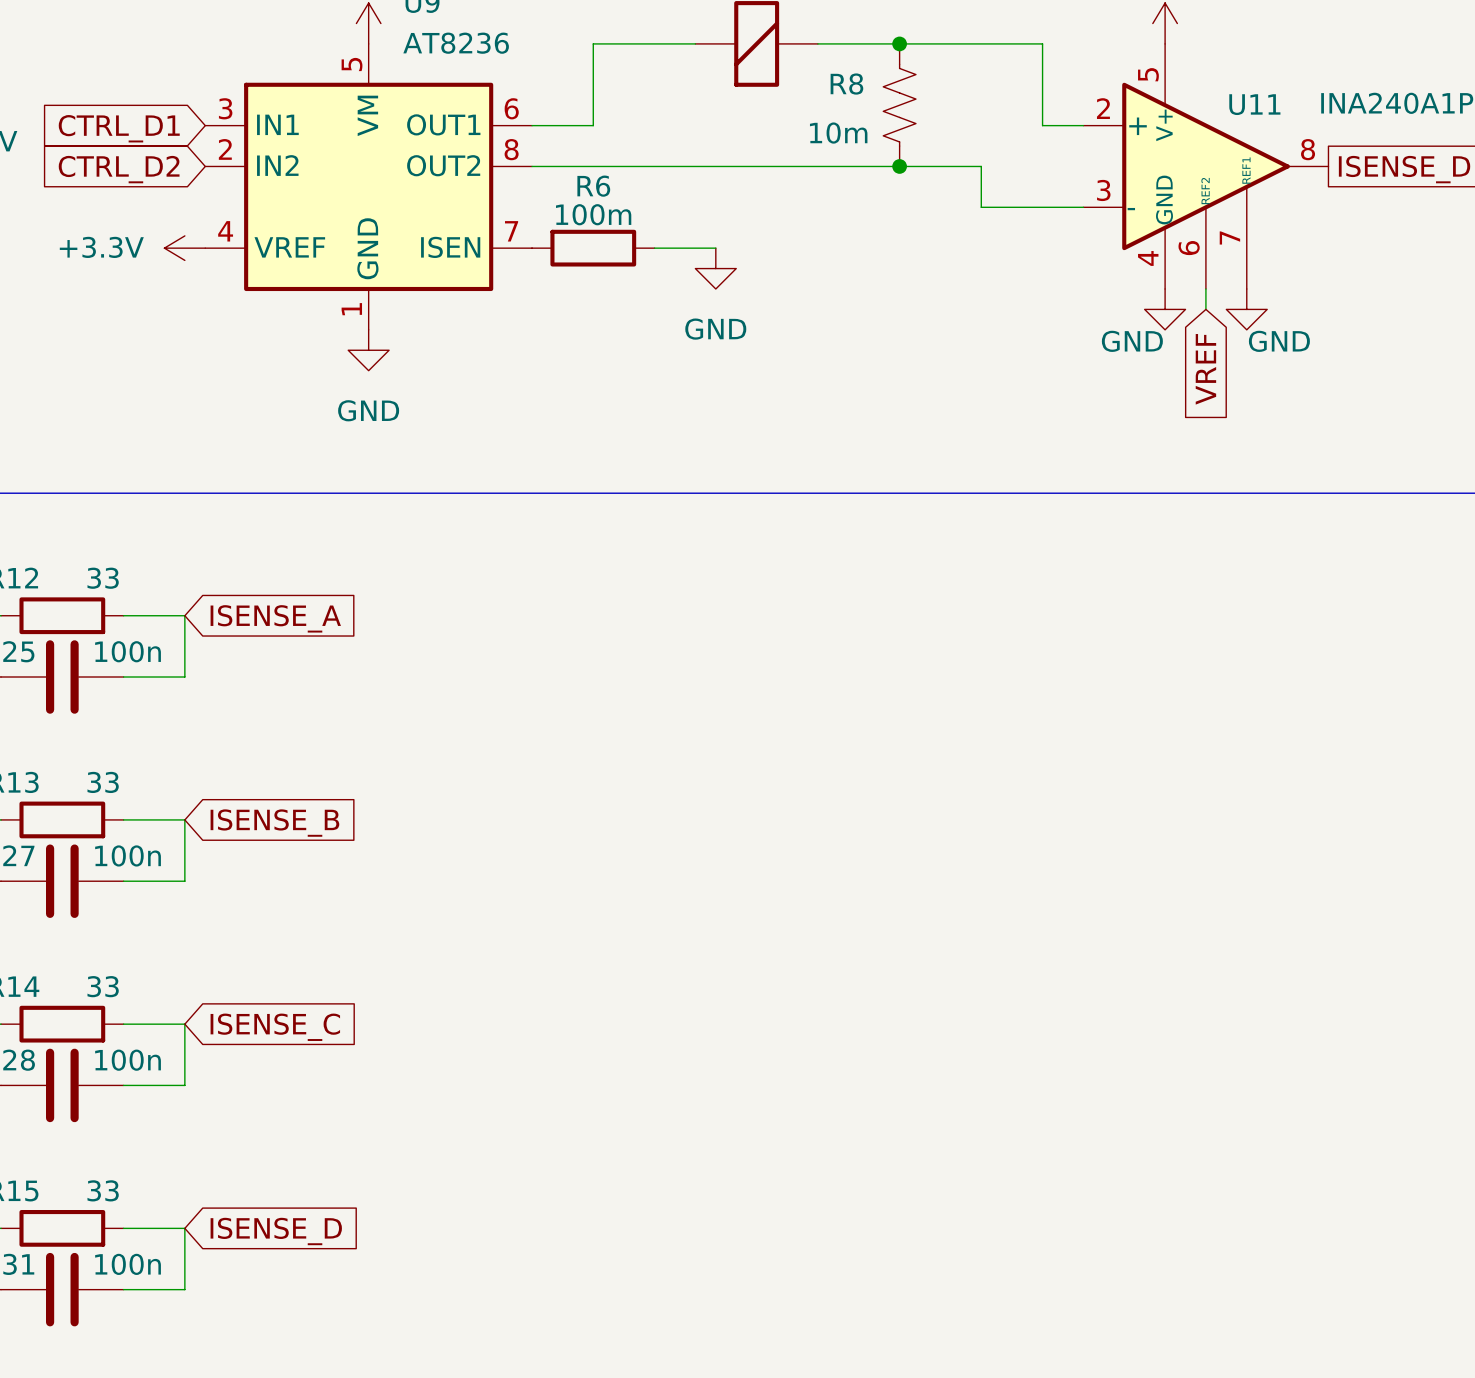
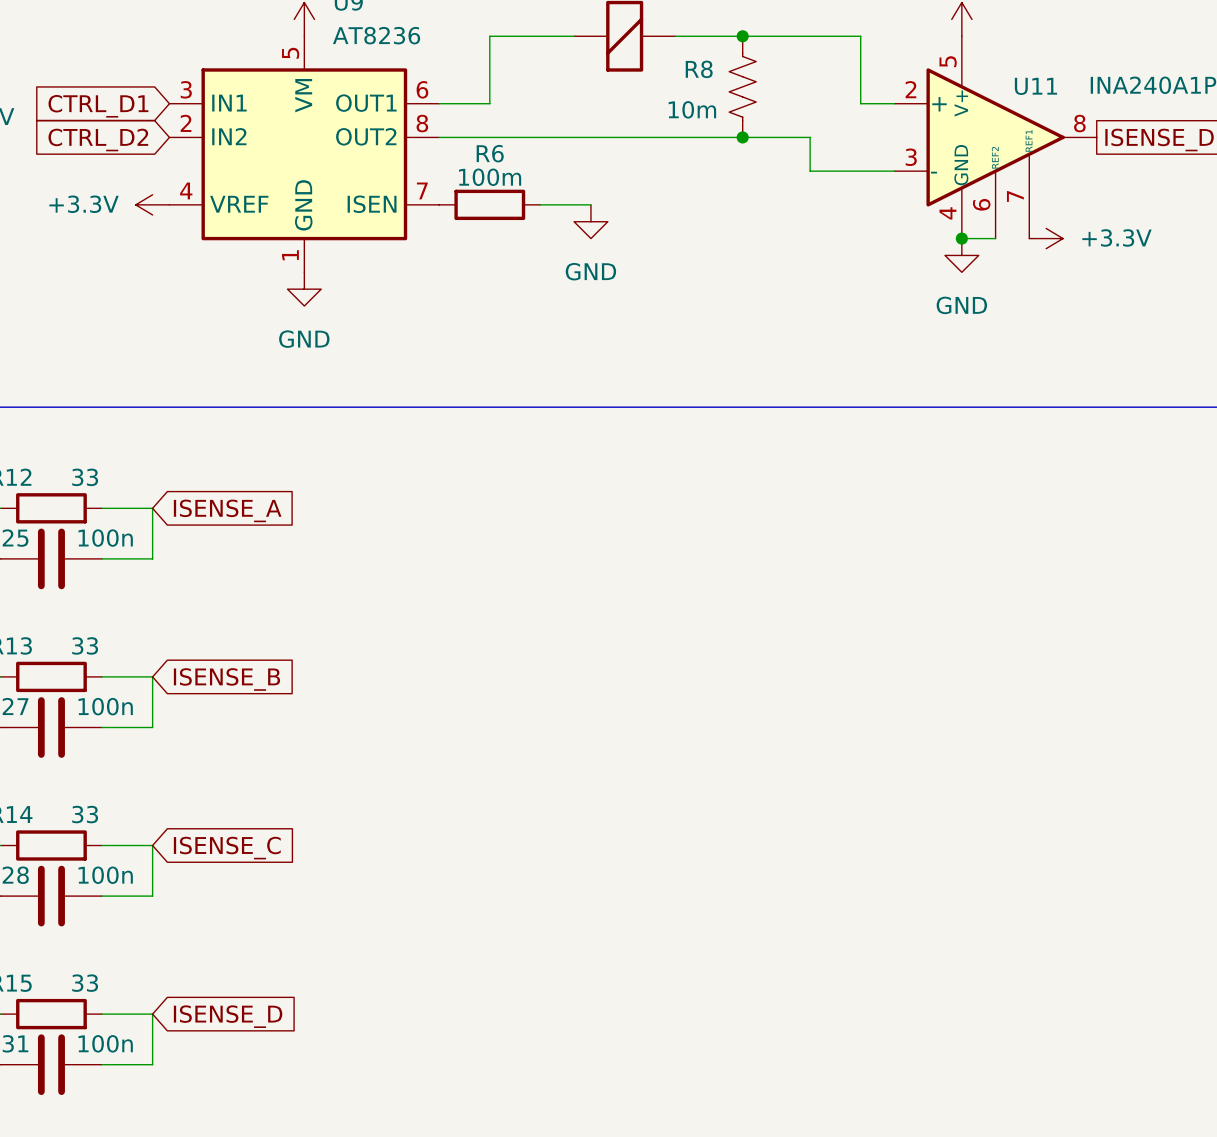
junction: none -> (961, 238)
wire: (1205, 288) (1205, 309) -> (995, 238) (961, 238)
power symbol: none -> +3.3V (1046, 238)
power symbol: GND (1246, 309) -> none
power symbol text position: GND (1132, 341) -> GND (961, 305)
global label: VREF (1205, 369) -> none

